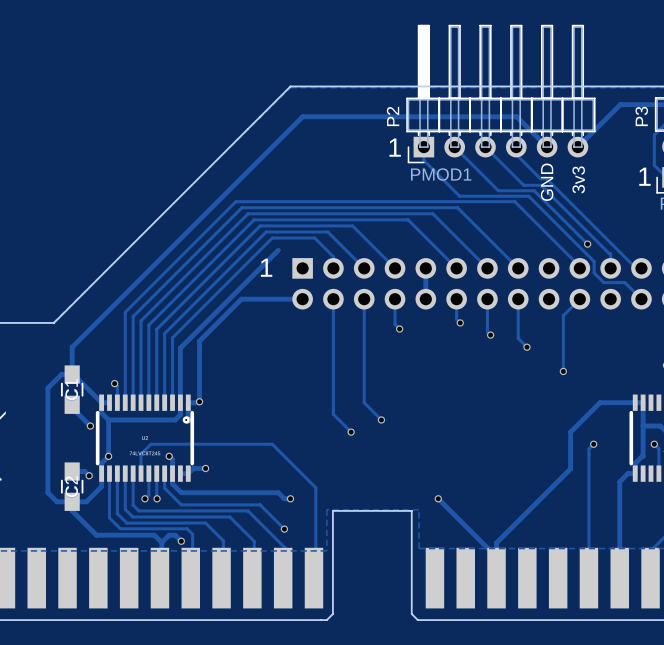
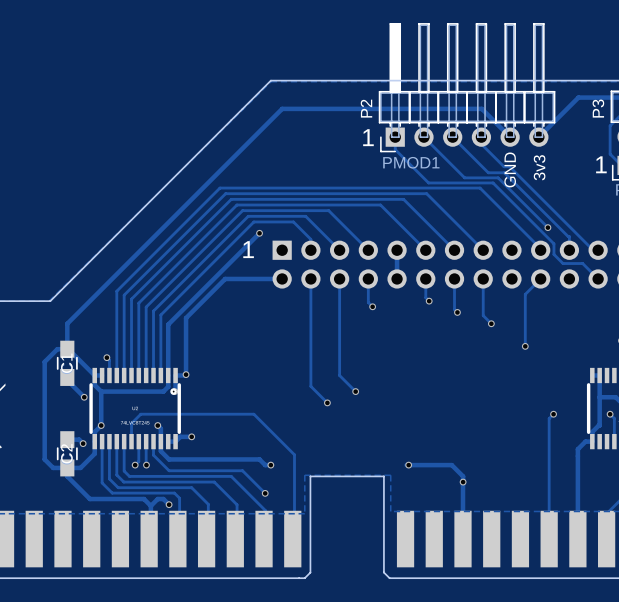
via: none -> (259, 233)
track: (635, 402) (600, 402) (570, 432) (570, 468) (496, 542) -> (462, 482) (462, 506)
track: none -> (406, 465) (451, 465) (463, 476) (463, 482)
track: (438, 498) (496, 557) -> none
via: none -> (463, 482)

